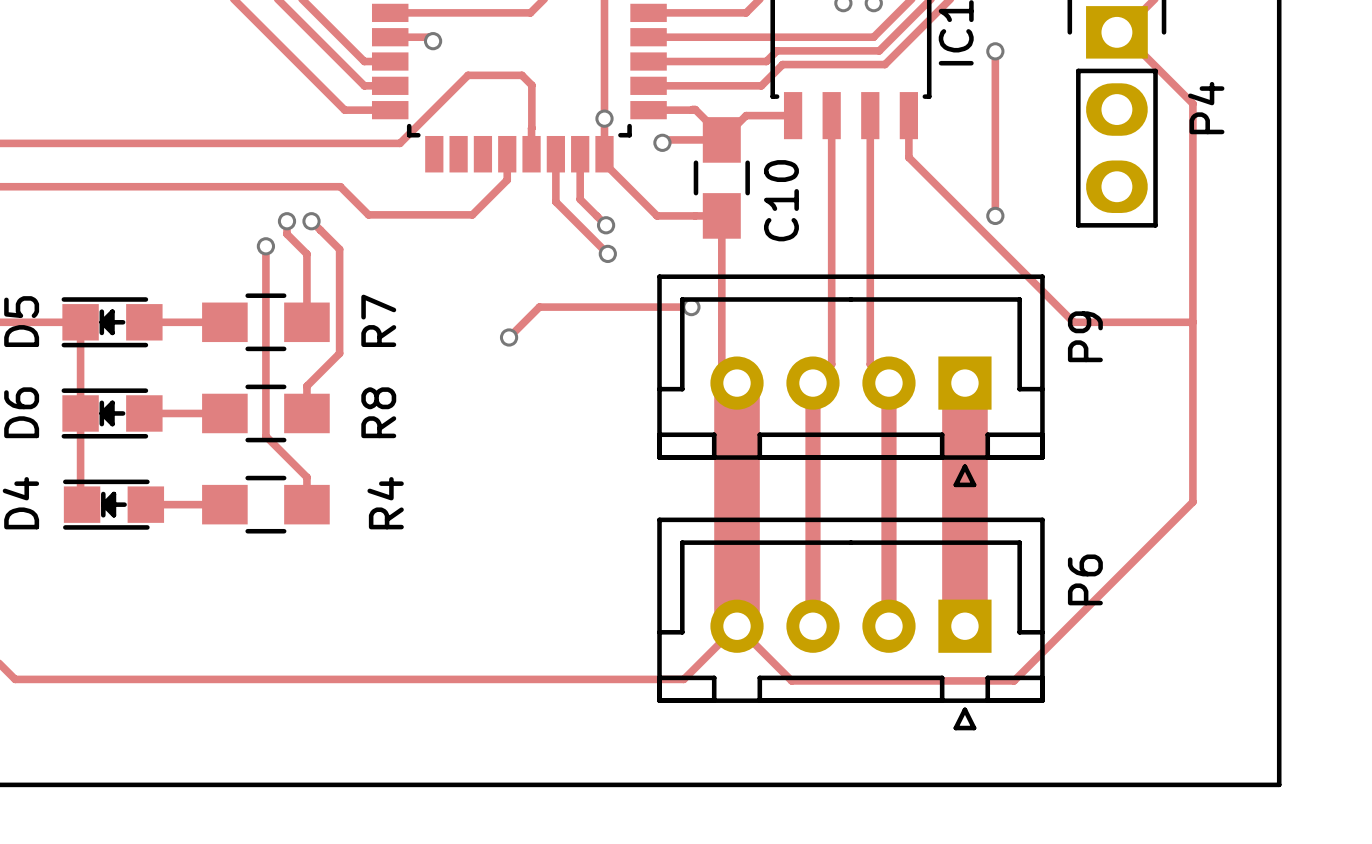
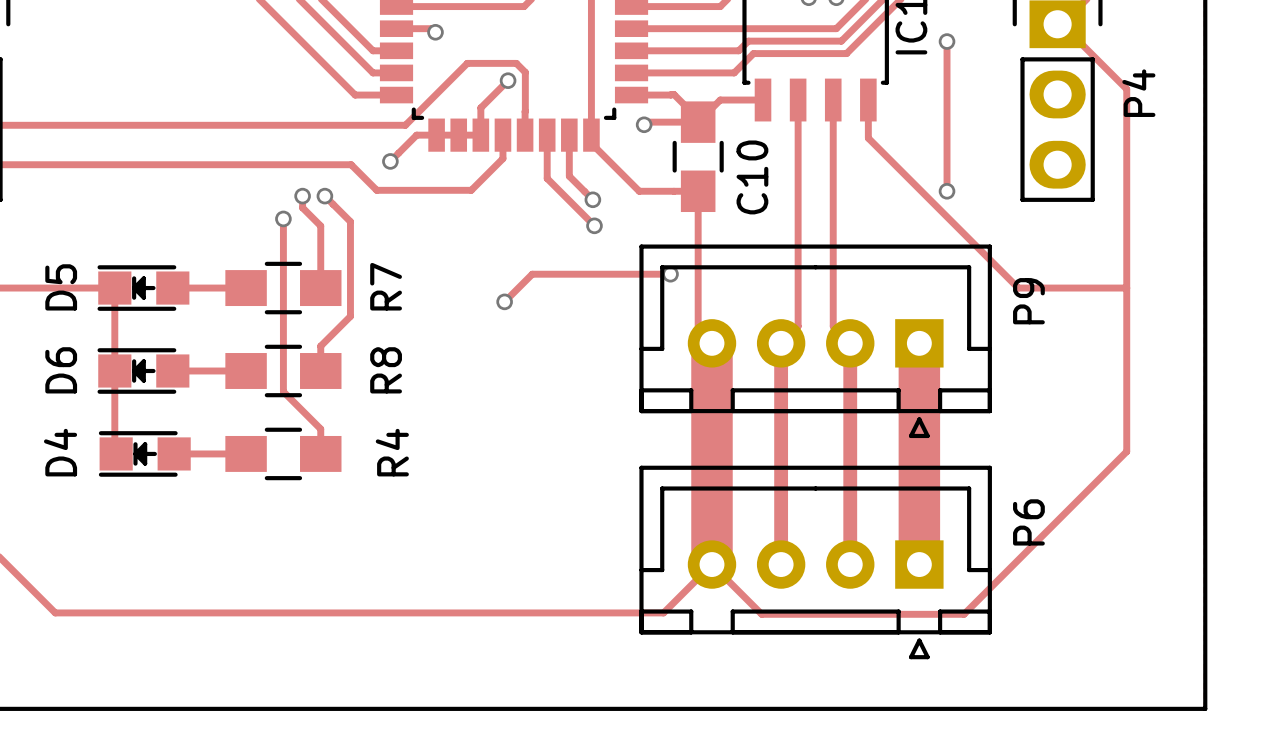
track: none -> (508, 80) (480, 107) (480, 135) (416, 135) (390, 161)
via position: (604, 118) -> (508, 80)
via: none -> (390, 161)

